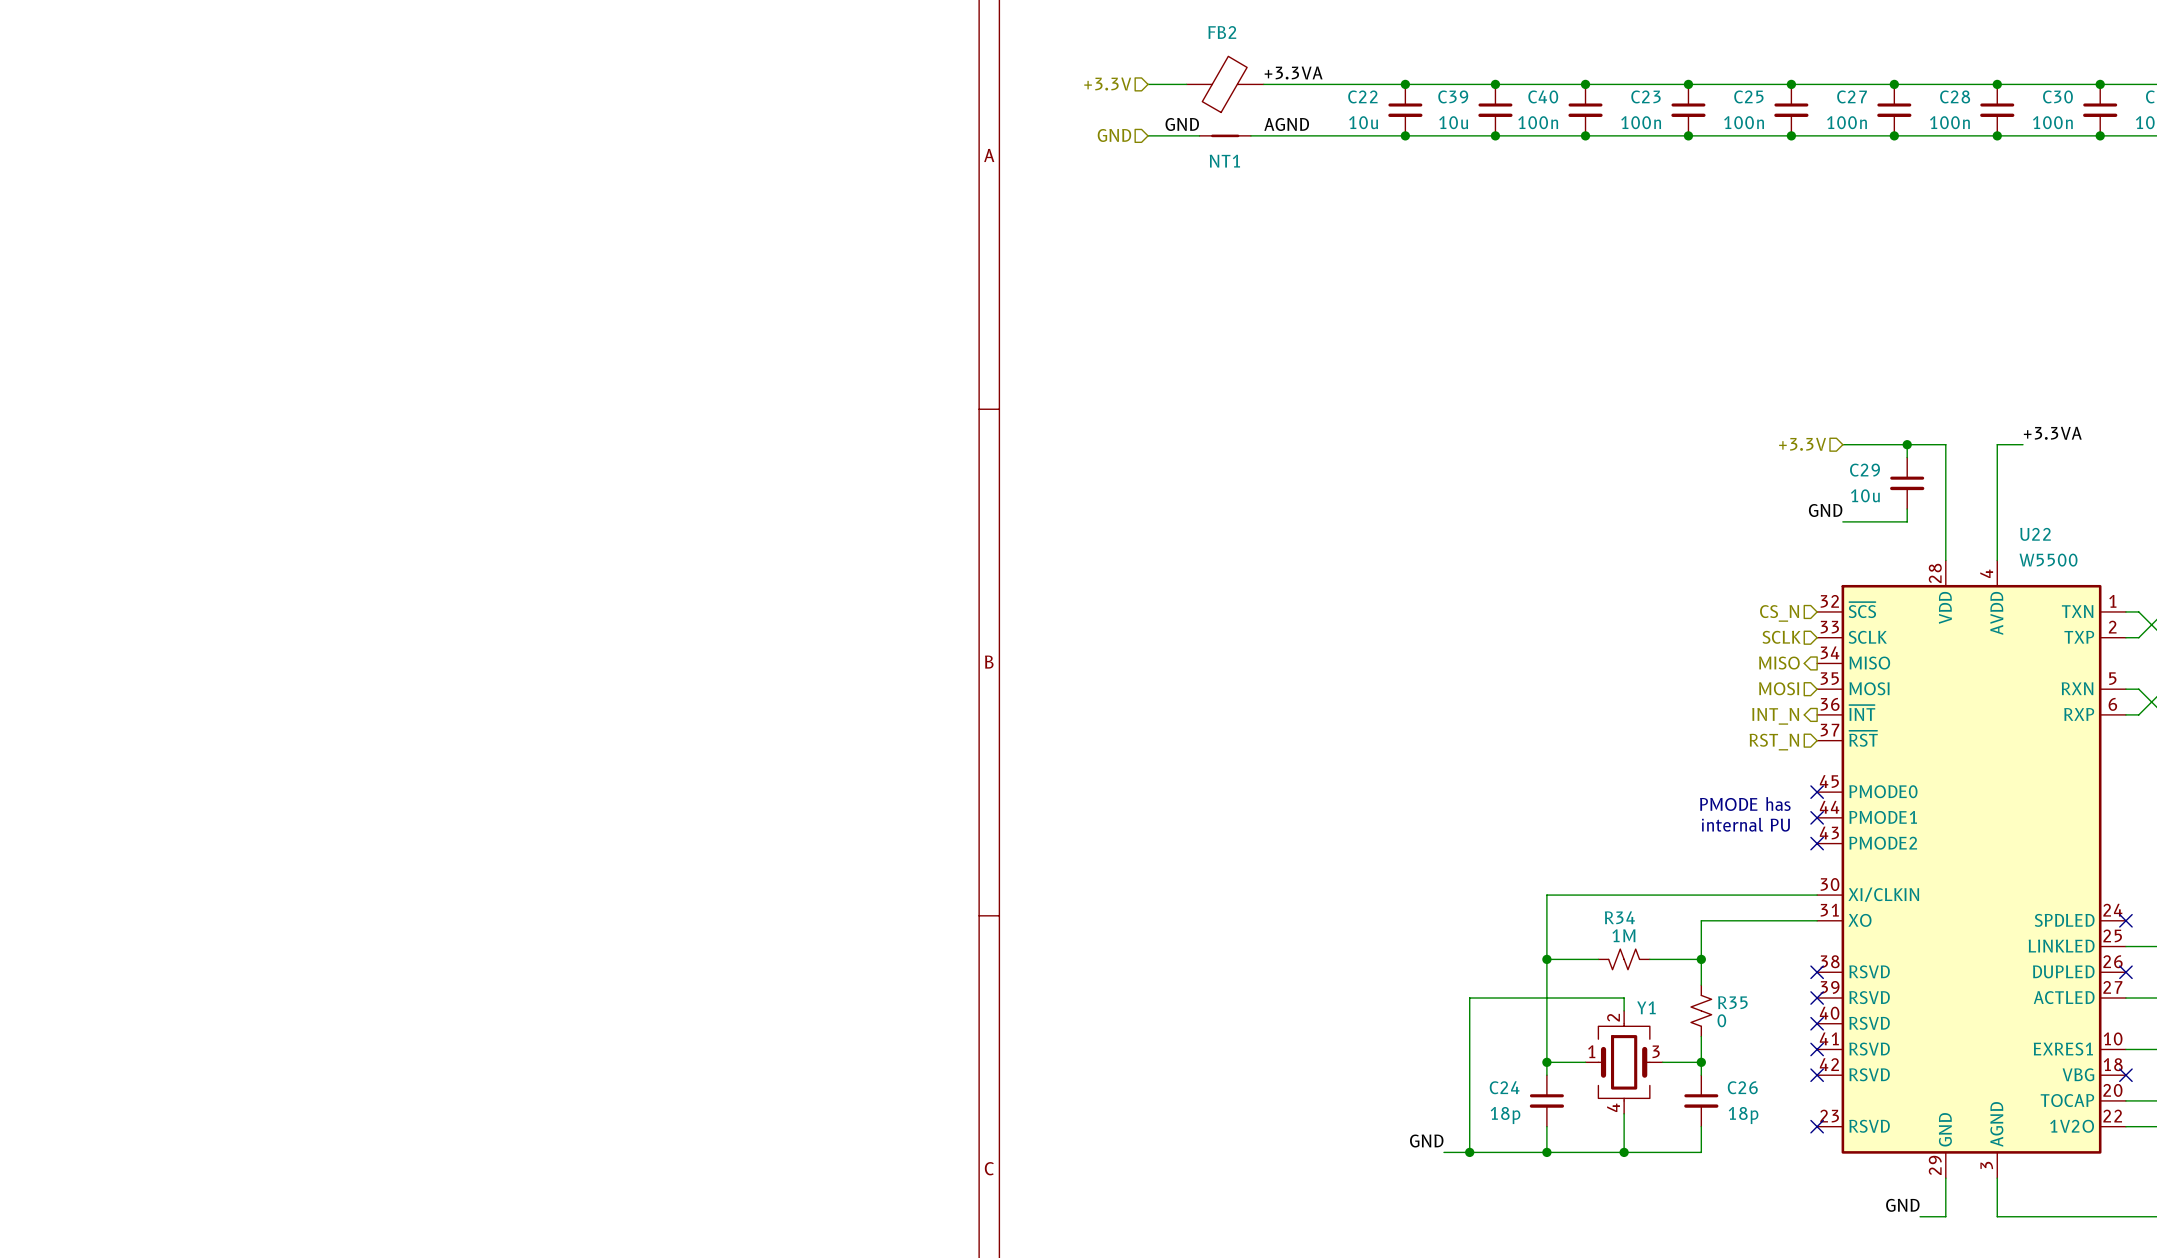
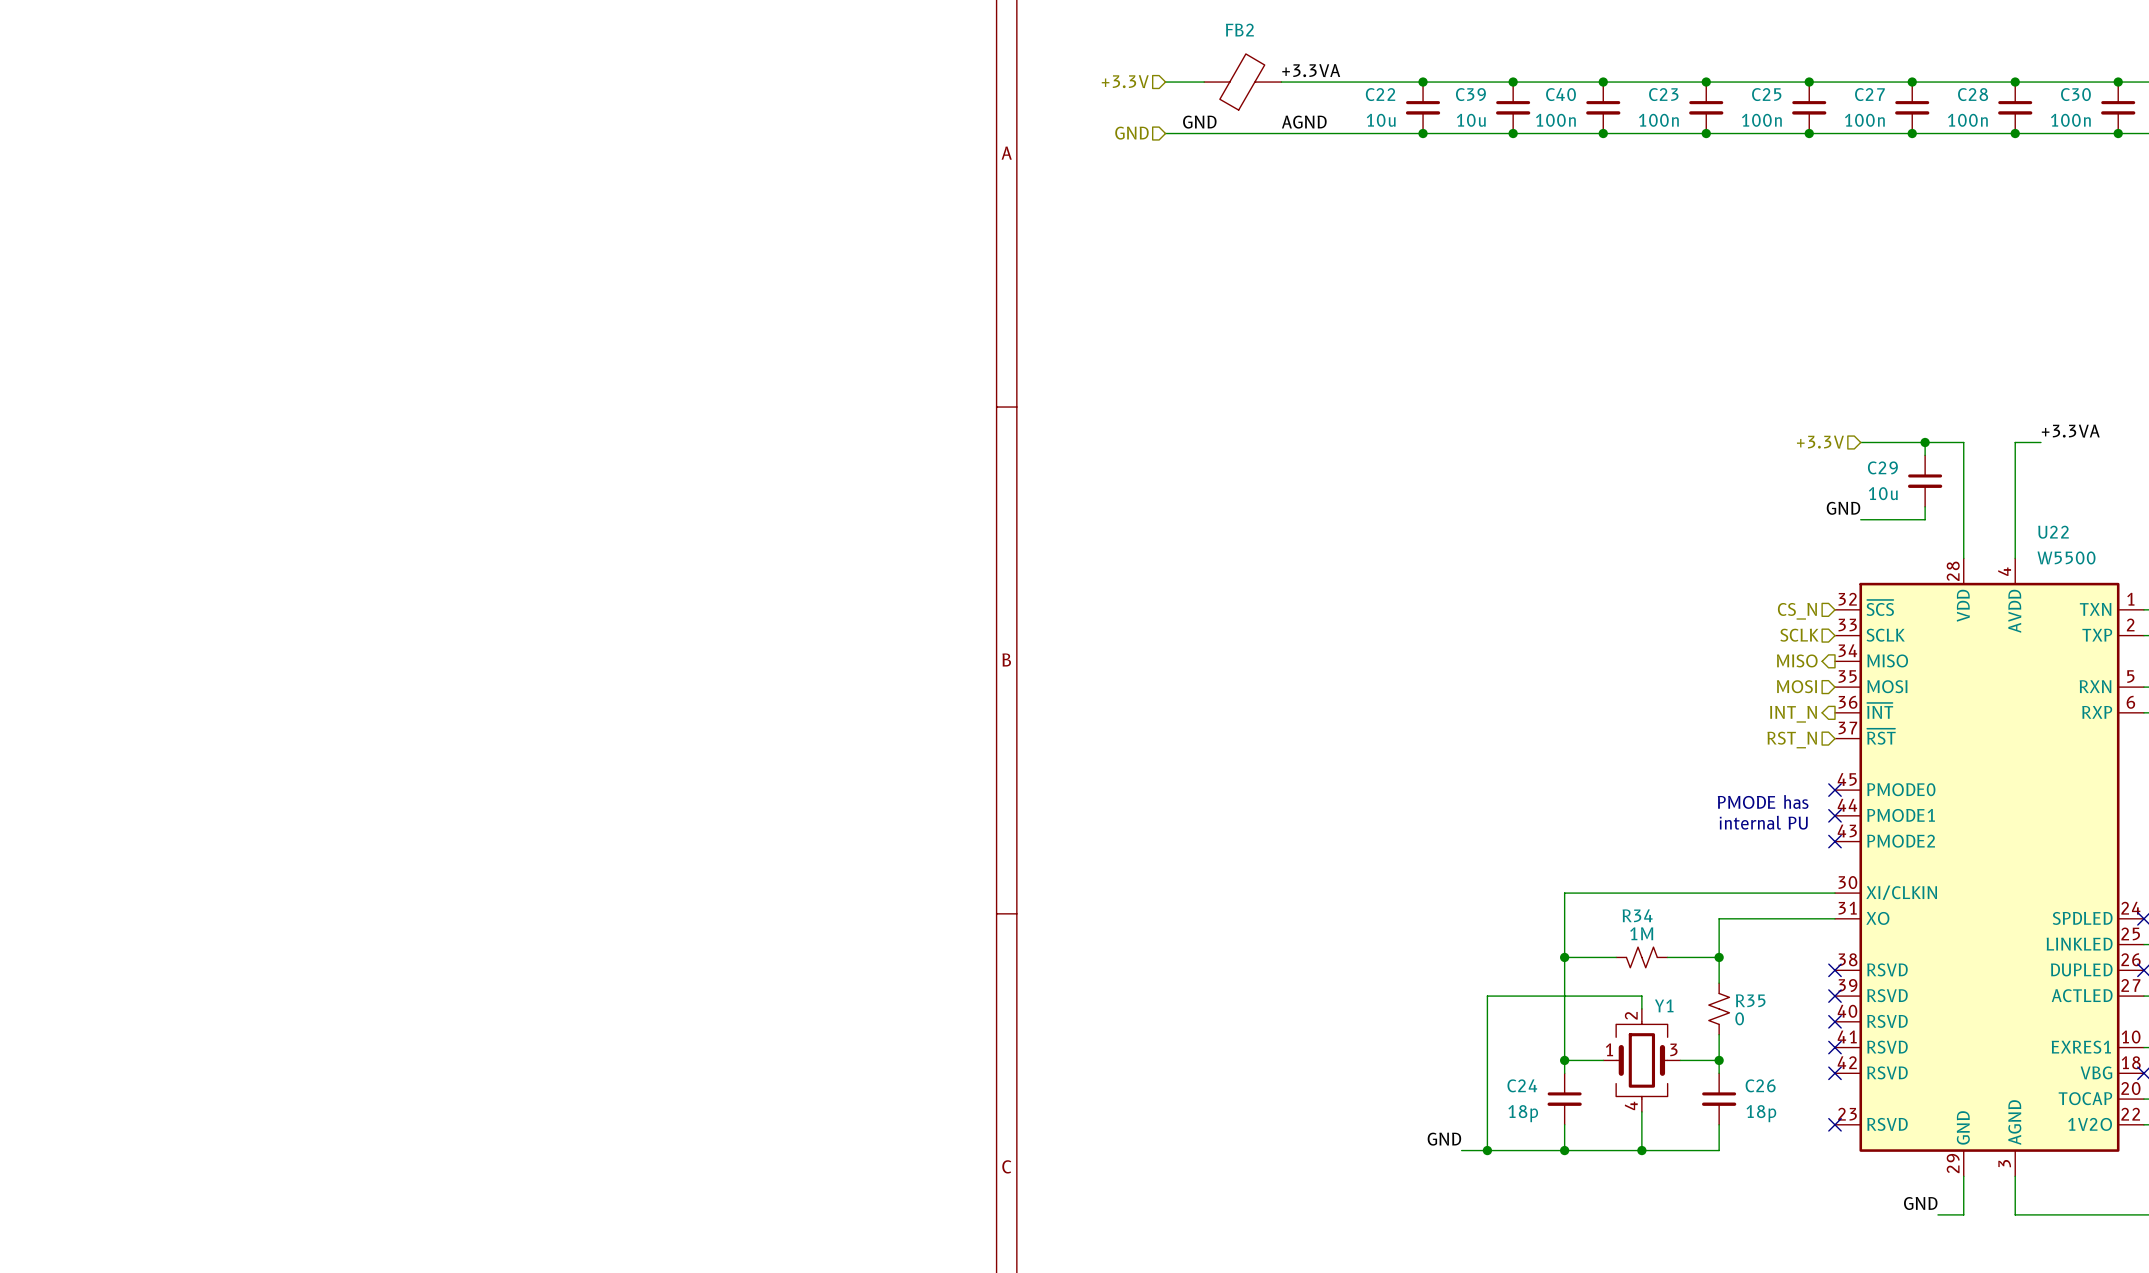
NT1: (1225, 135) -> none

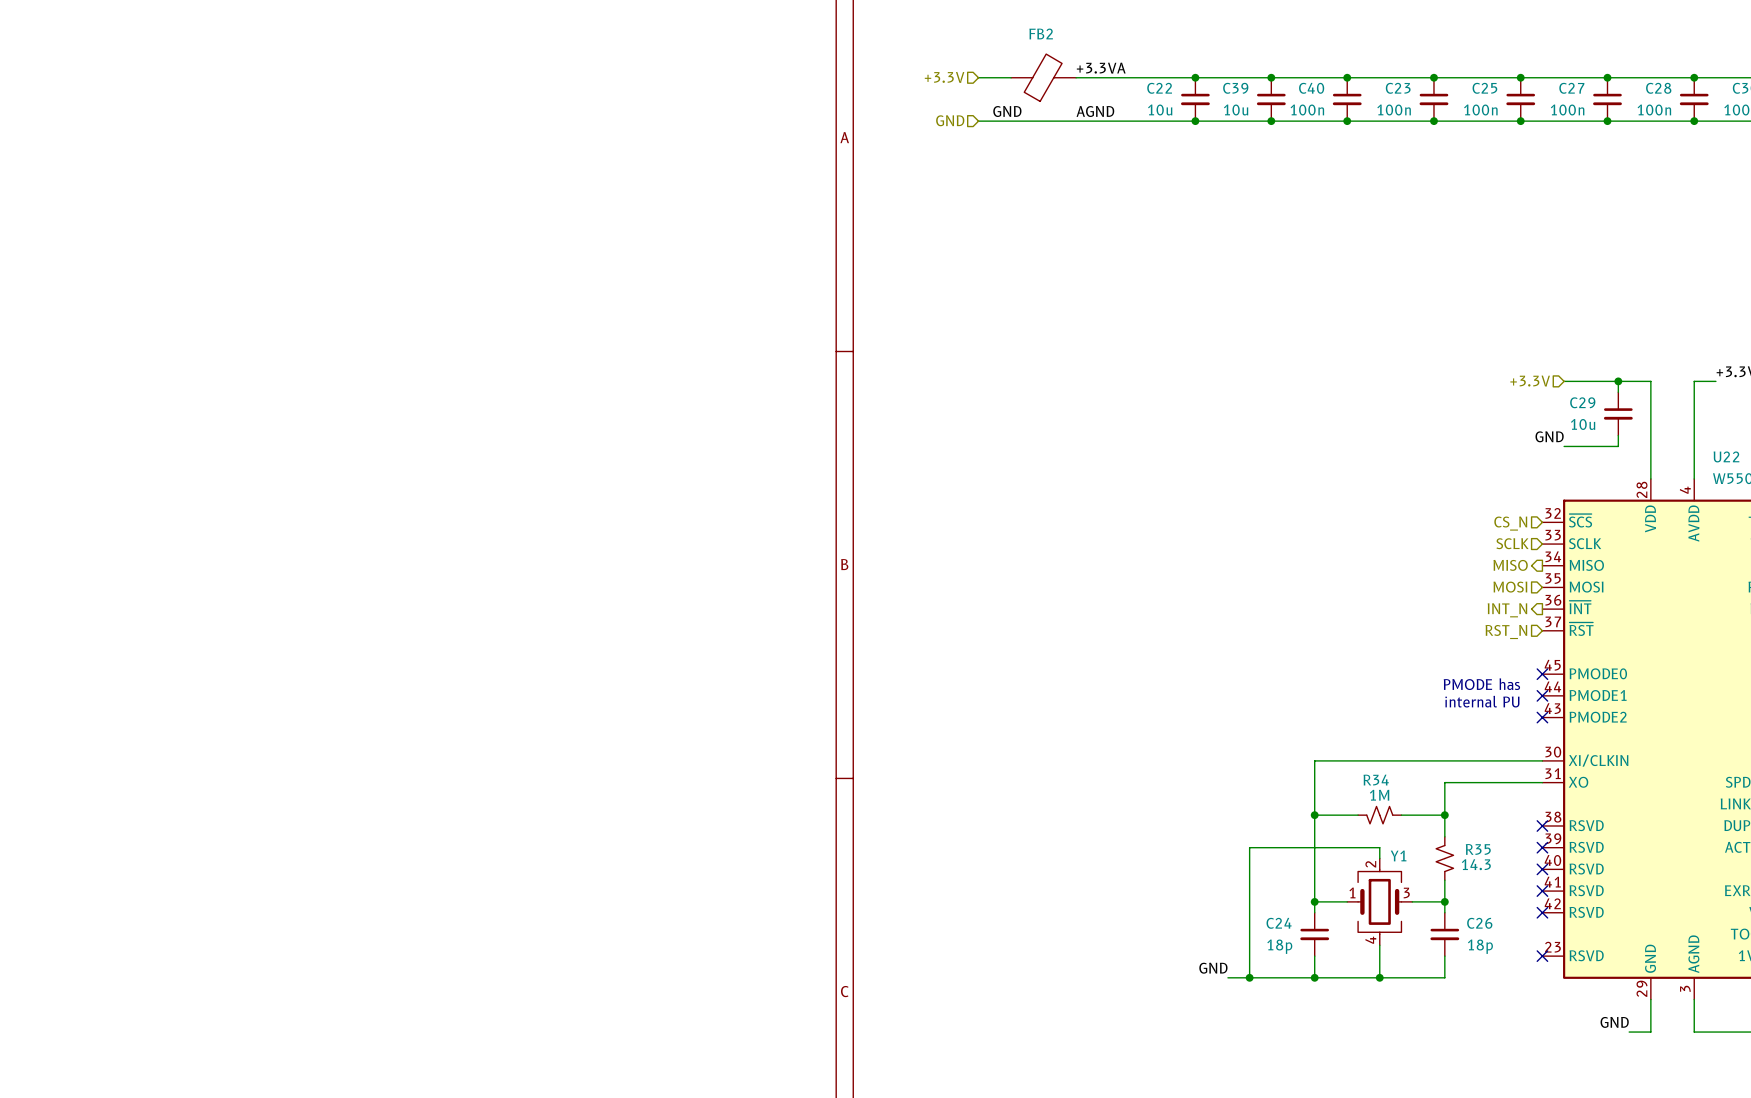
R35 flip: as is (1719, 1008) -> left-right (1444, 858)
R35 value: 0 (1739, 1018) -> 14.3 (1476, 864)

